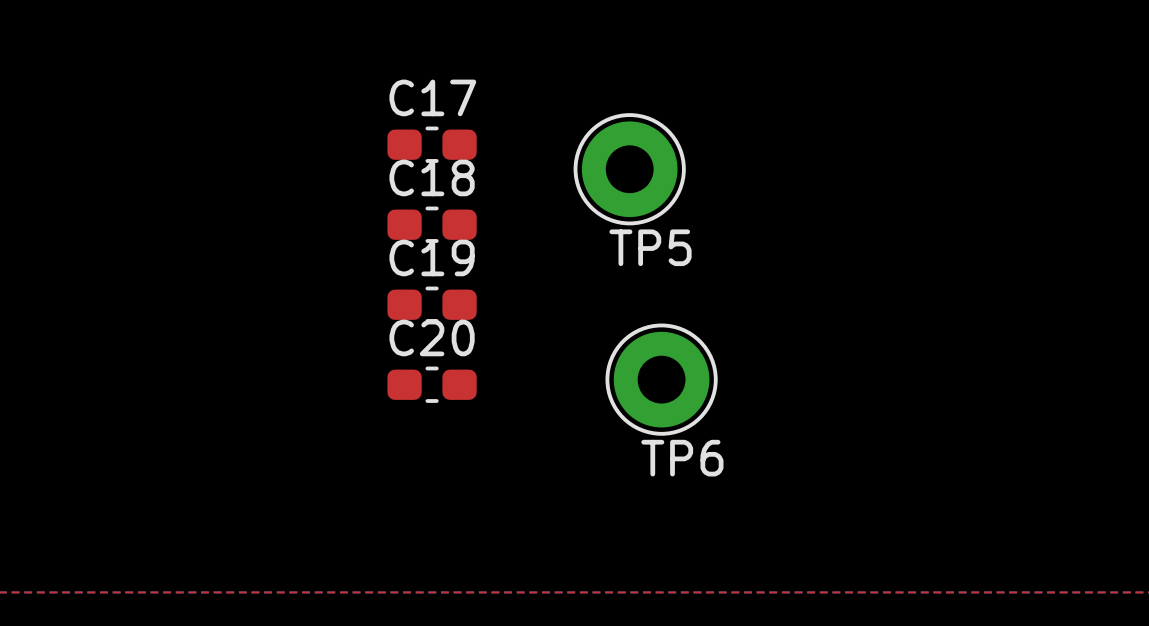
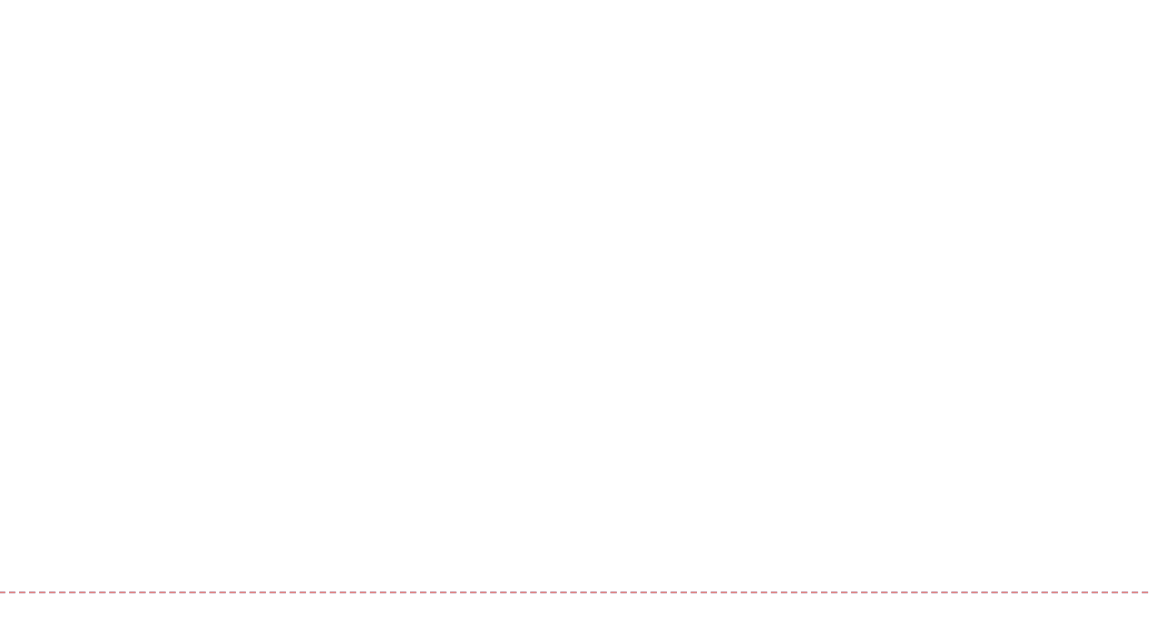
C17: (432, 144) -> none
TP5: (629, 169) -> none
C18: (432, 224) -> none
C19: (432, 304) -> none
TP6: (661, 379) -> none
C20: (432, 384) -> none

